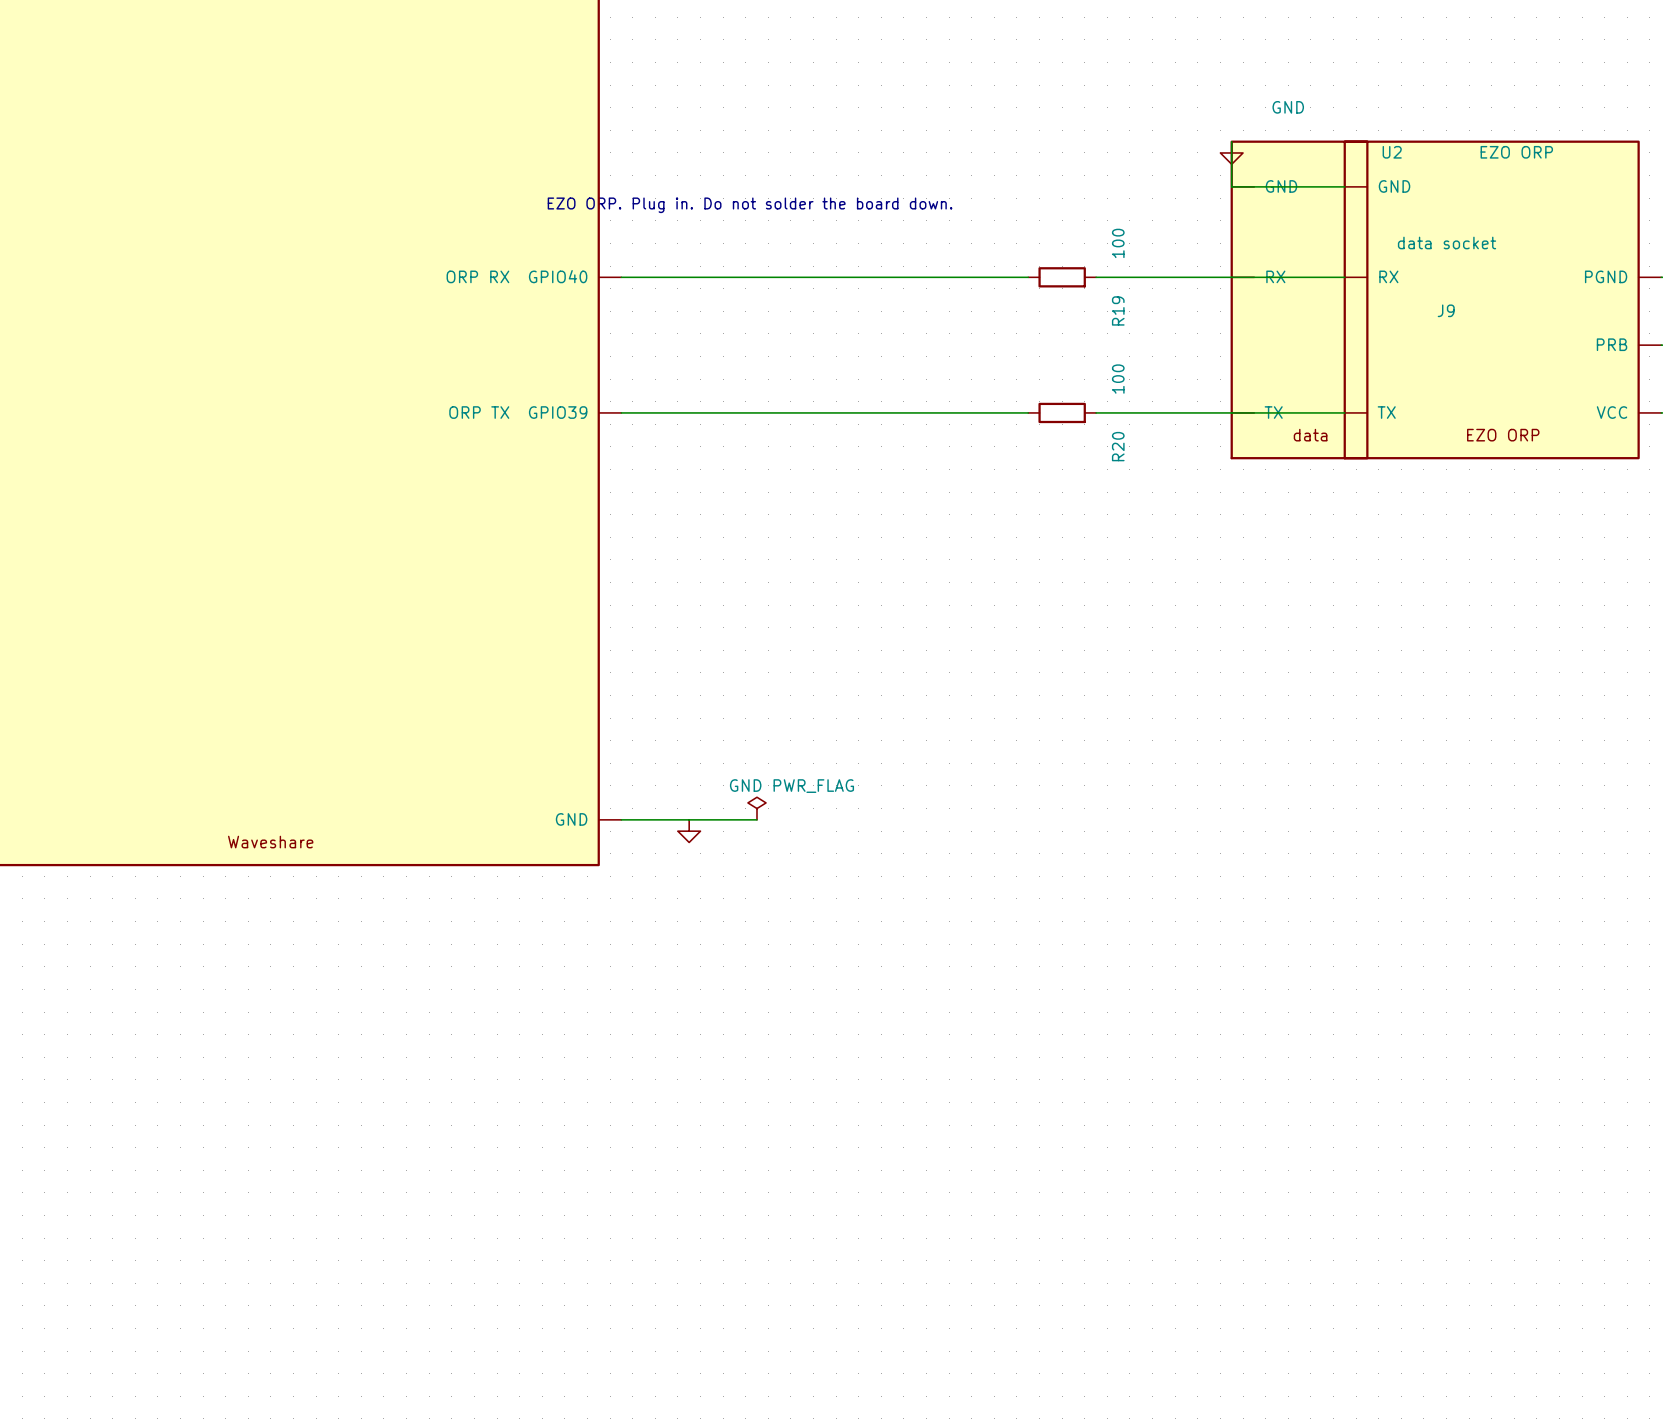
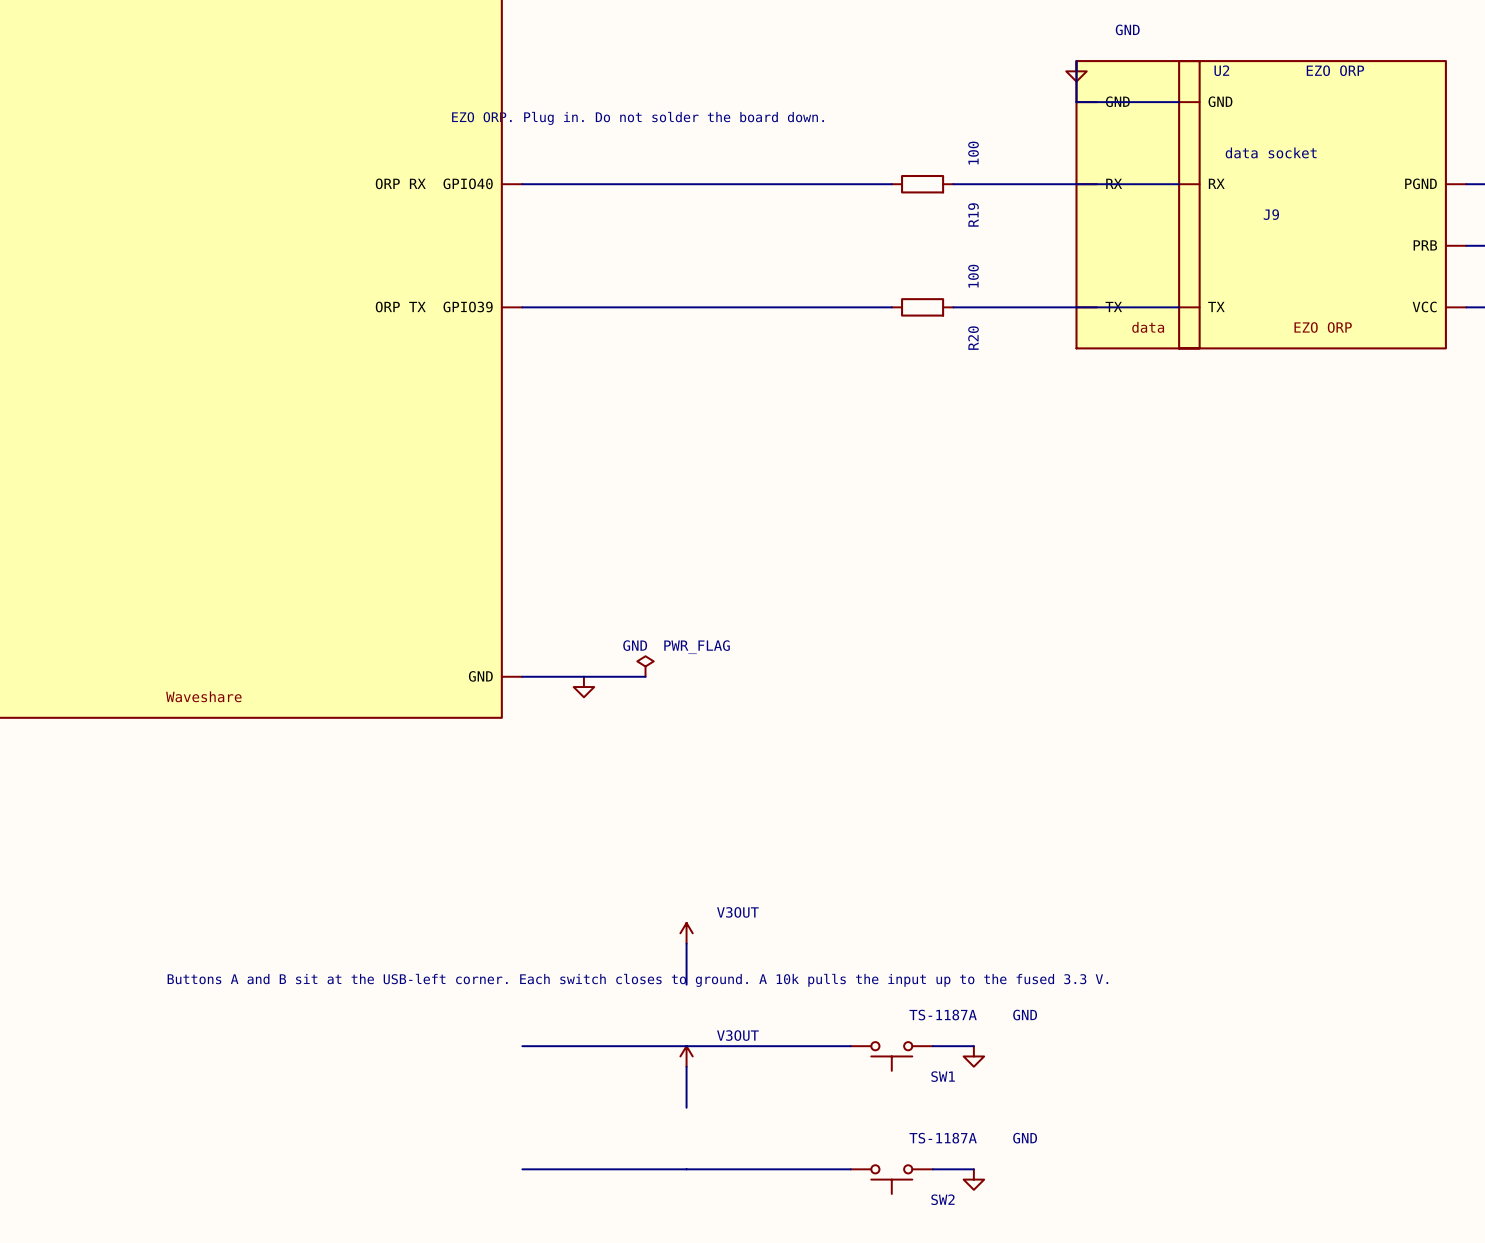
power symbol: none -> V3OUT (686, 933)
wire: none -> (686, 943) (686, 984)
text: none -> Buttons A and B sit at the USB-left corner. Each switch closes to ground. A 10k pulls the input up to the fused 3.3 V. (637, 980)
wire: none -> (522, 1046) (850, 1046)
wire: none -> (932, 1046) (973, 1046)
power symbol: none -> V3OUT (686, 1056)
SW1: none -> TS-1187A (891, 1056)
power symbol: none -> GND (973, 1056)
wire: none -> (686, 1066) (686, 1107)
wire: none -> (522, 1169) (850, 1169)
wire: none -> (932, 1169) (973, 1169)
SW2: none -> TS-1187A (891, 1179)
power symbol: none -> GND (973, 1179)

